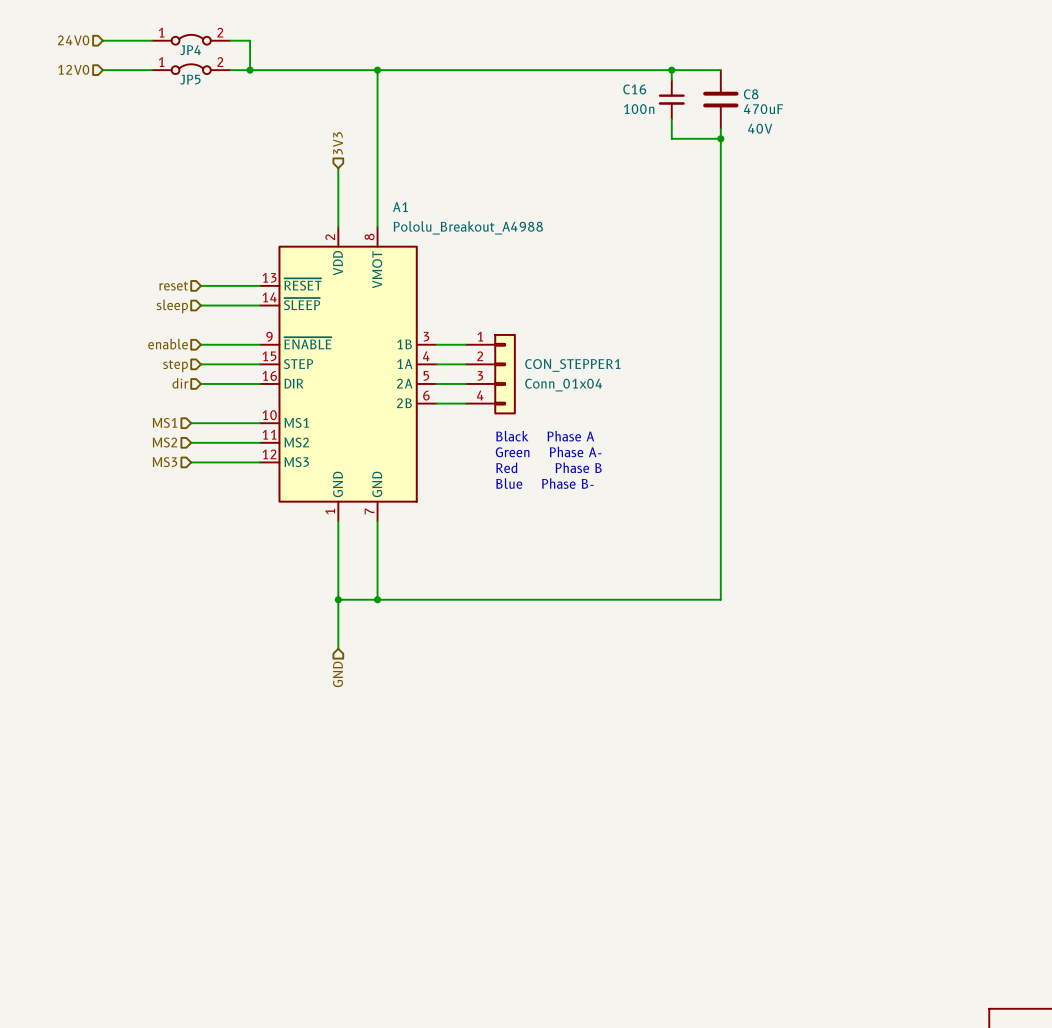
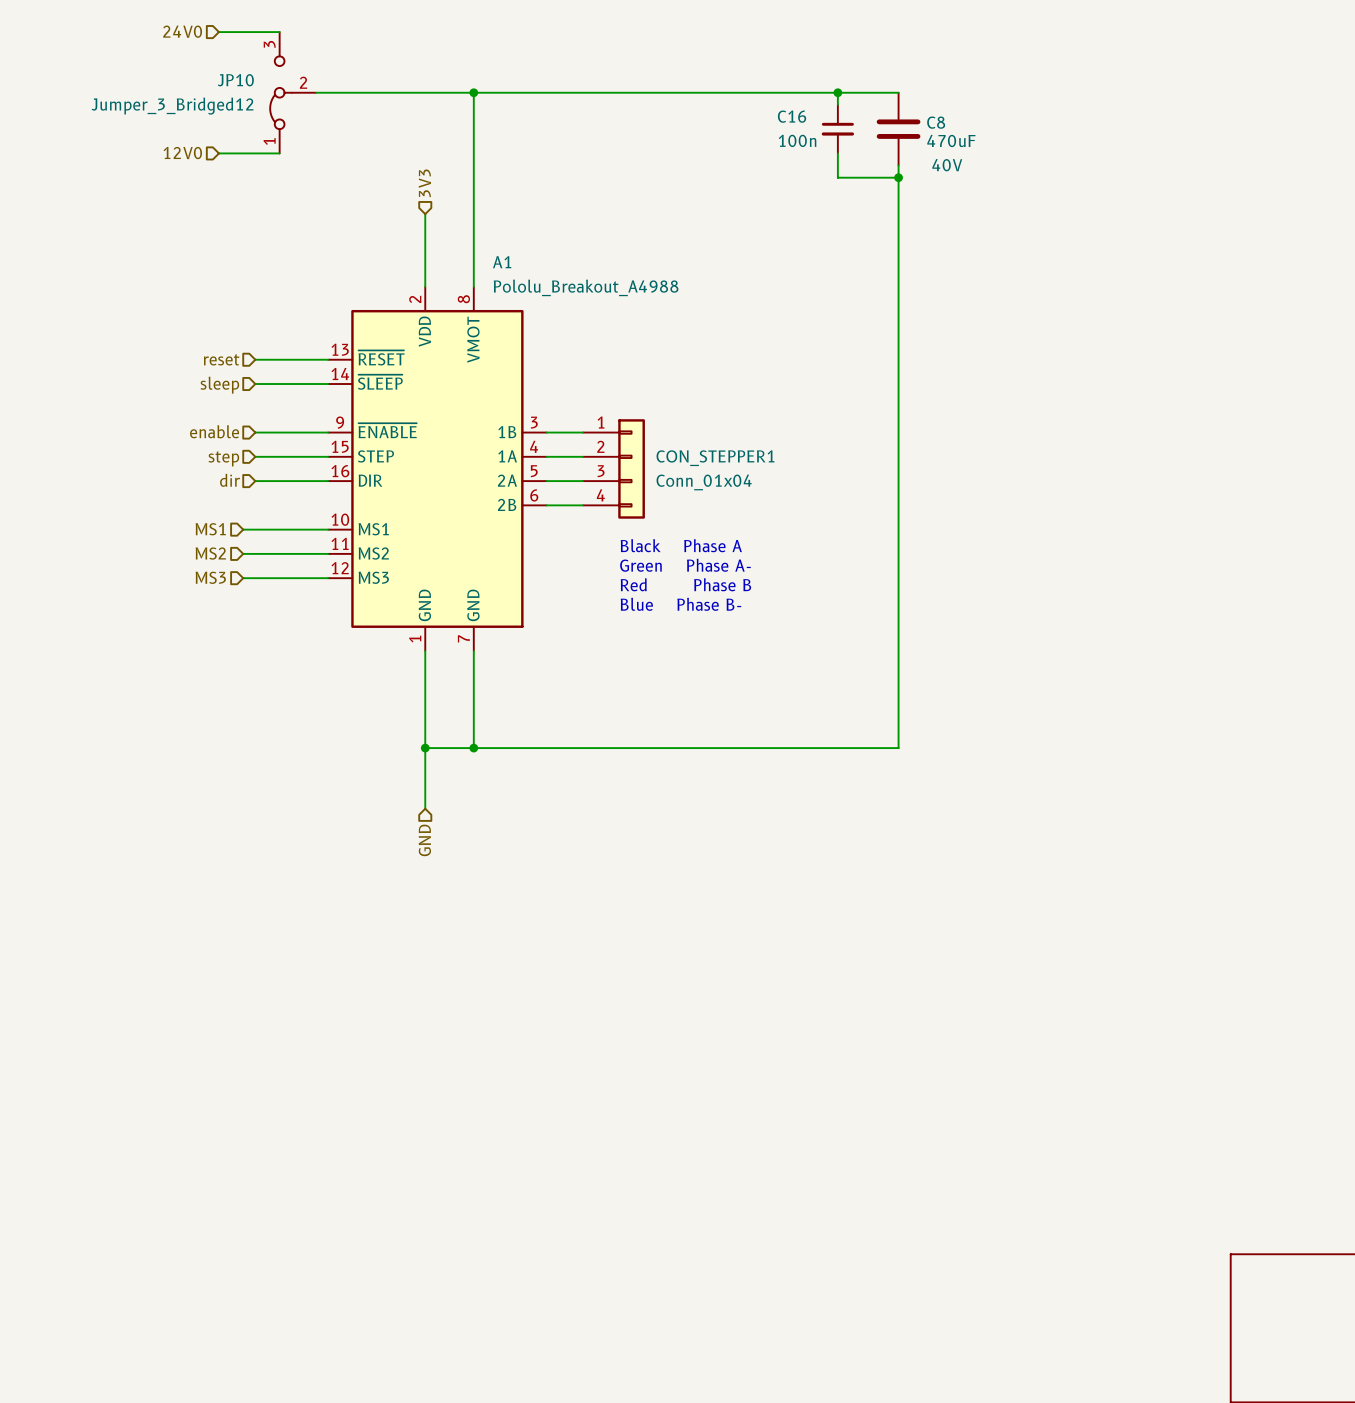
JP4: (191, 39) -> none
hierarchical label position: 24V0 (73, 40) -> 24V0 (182, 31)
wire: (102, 40) (151, 40) -> (218, 32) (279, 32)
wire: (230, 40) (250, 40) (250, 70) (230, 70) -> none
hierarchical label position: 12V0 (73, 69) -> 12V0 (182, 153)
JP5: (191, 69) -> none
wire: (102, 70) (151, 70) -> (218, 153) (279, 153)
JP10: none -> Jumper_3_Bridged12 (293, 92)
junction: (250, 70) -> none

